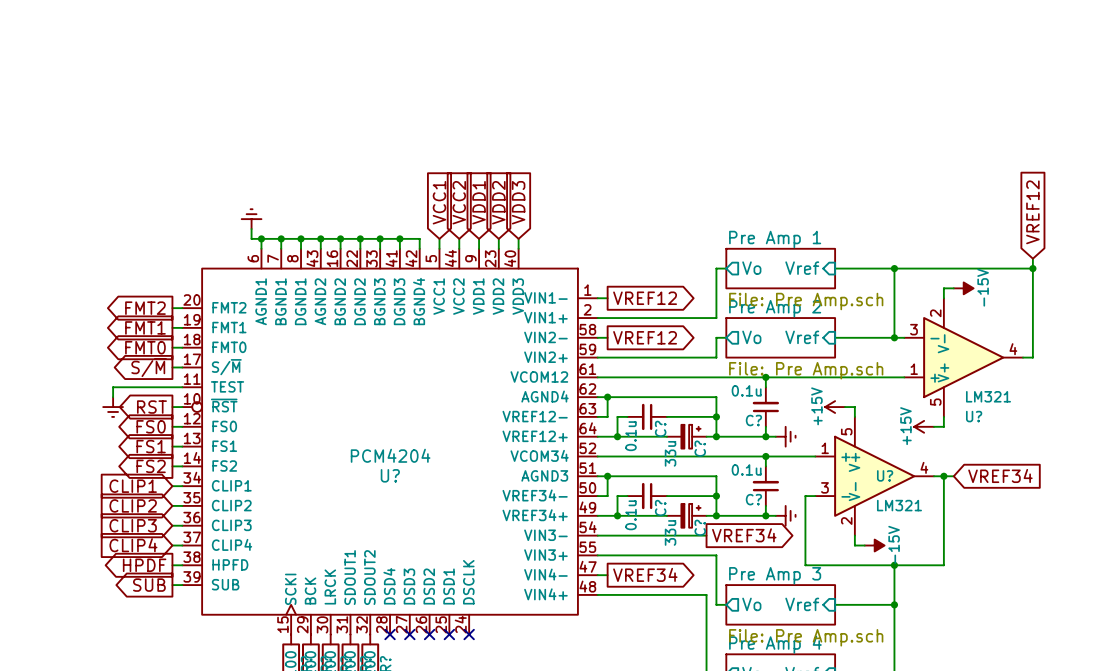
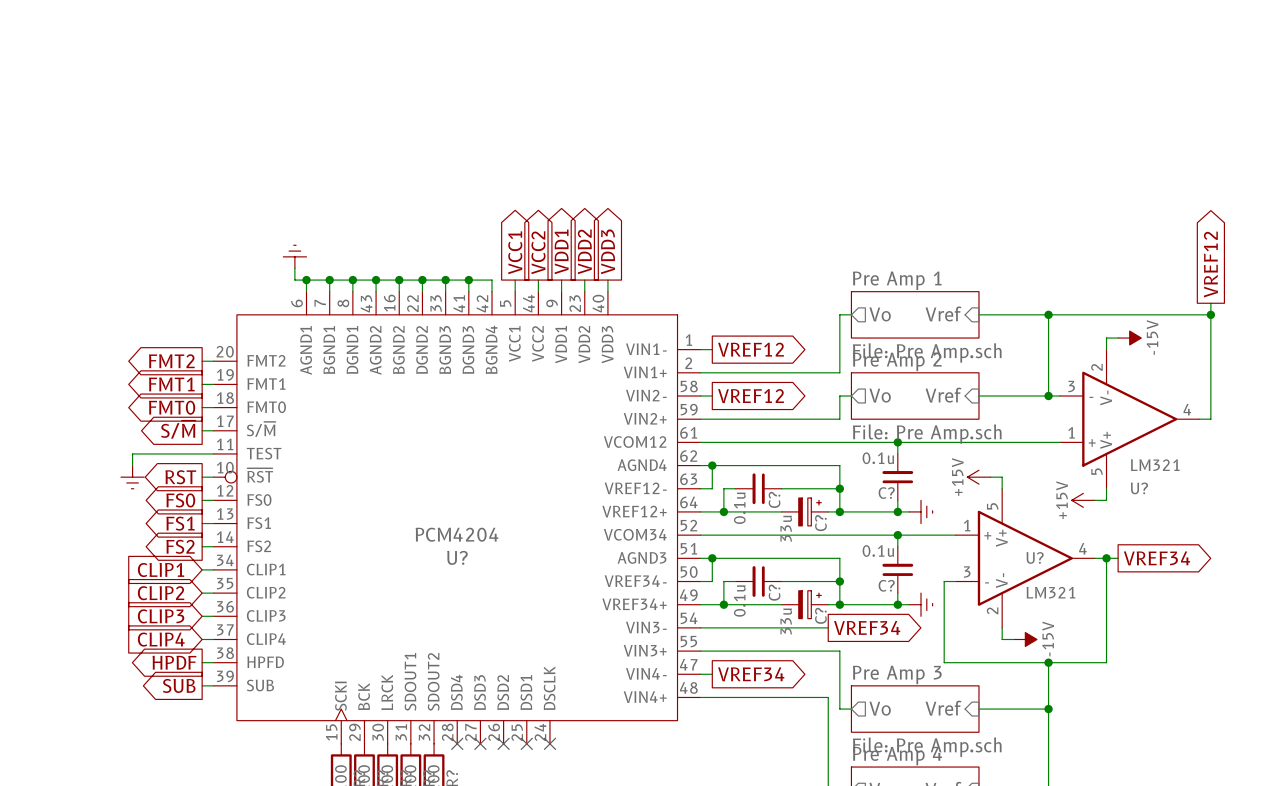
global label shape: input (439, 202) -> output (515, 252)
global label shape: input (459, 202) -> output (538, 252)
global label shape: input (479, 202) -> output (561, 251)
global label shape: input (498, 202) -> output (584, 251)
global label shape: input (518, 202) -> output (608, 251)
global label shape: input (1032, 212) -> output (1210, 264)
global label shape: input (1000, 475) -> output (1157, 558)

